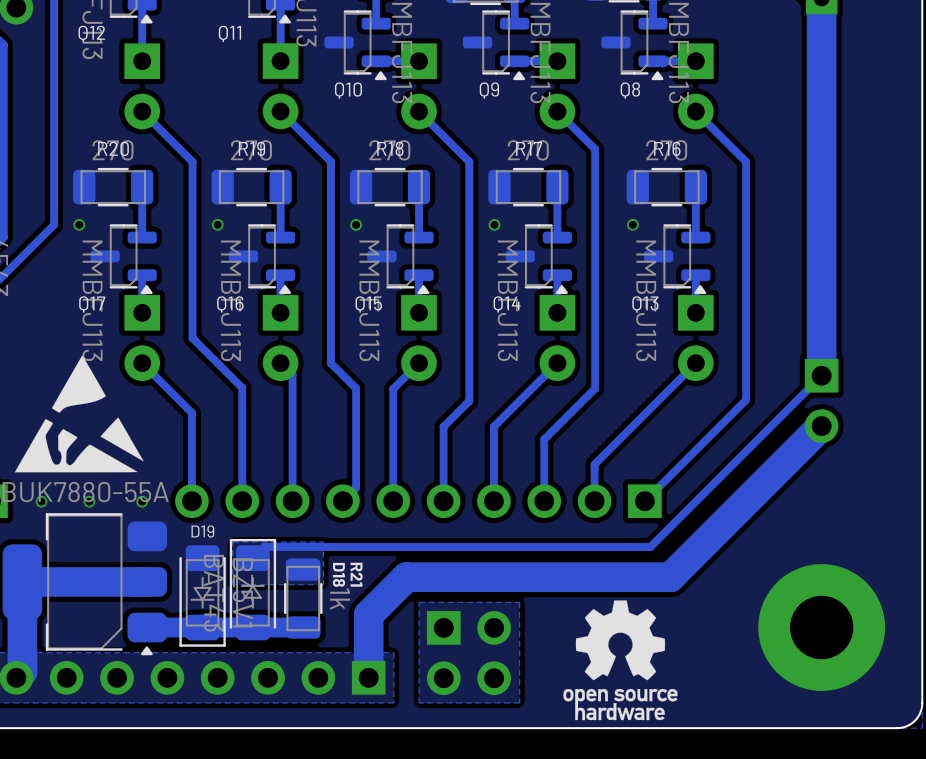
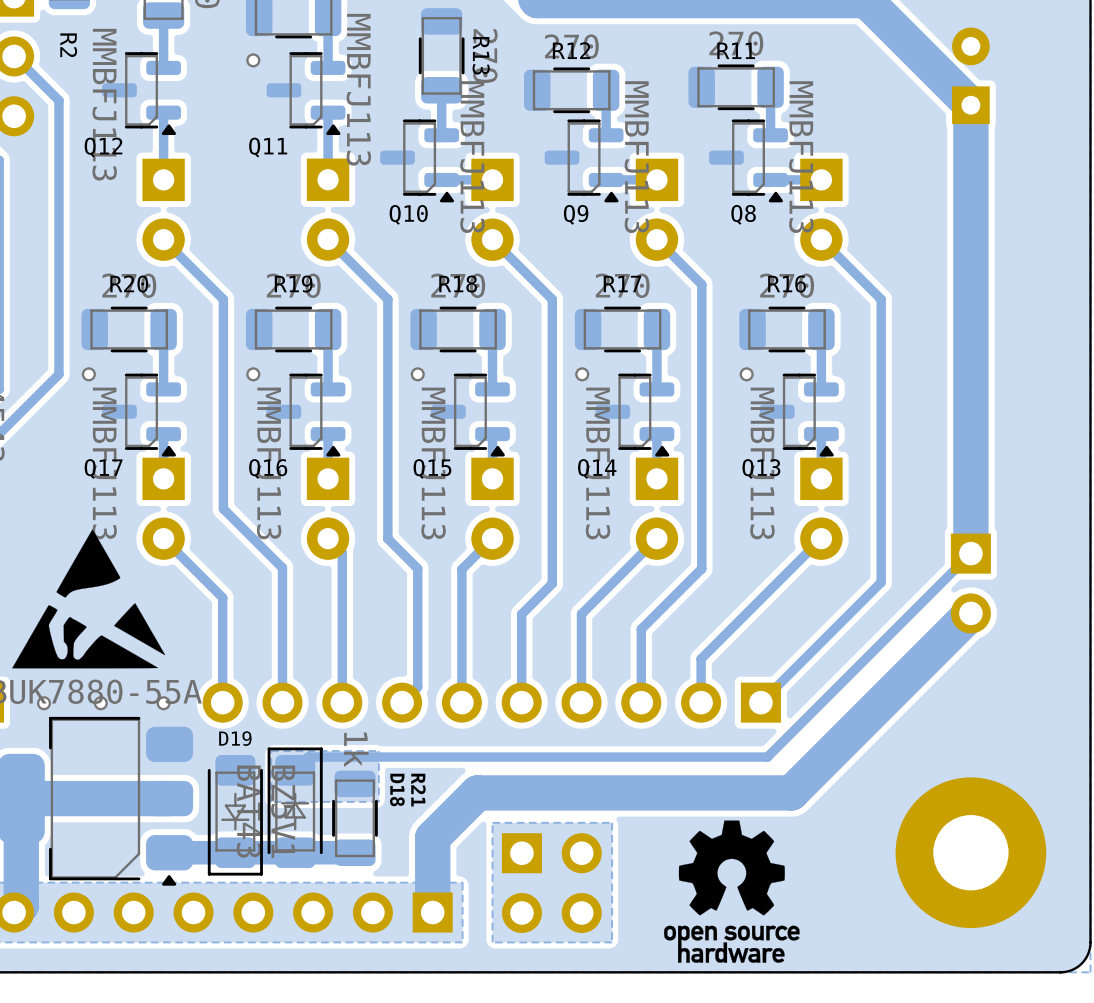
R21 value position: 1k (340, 598) -> 1k (356, 749)

